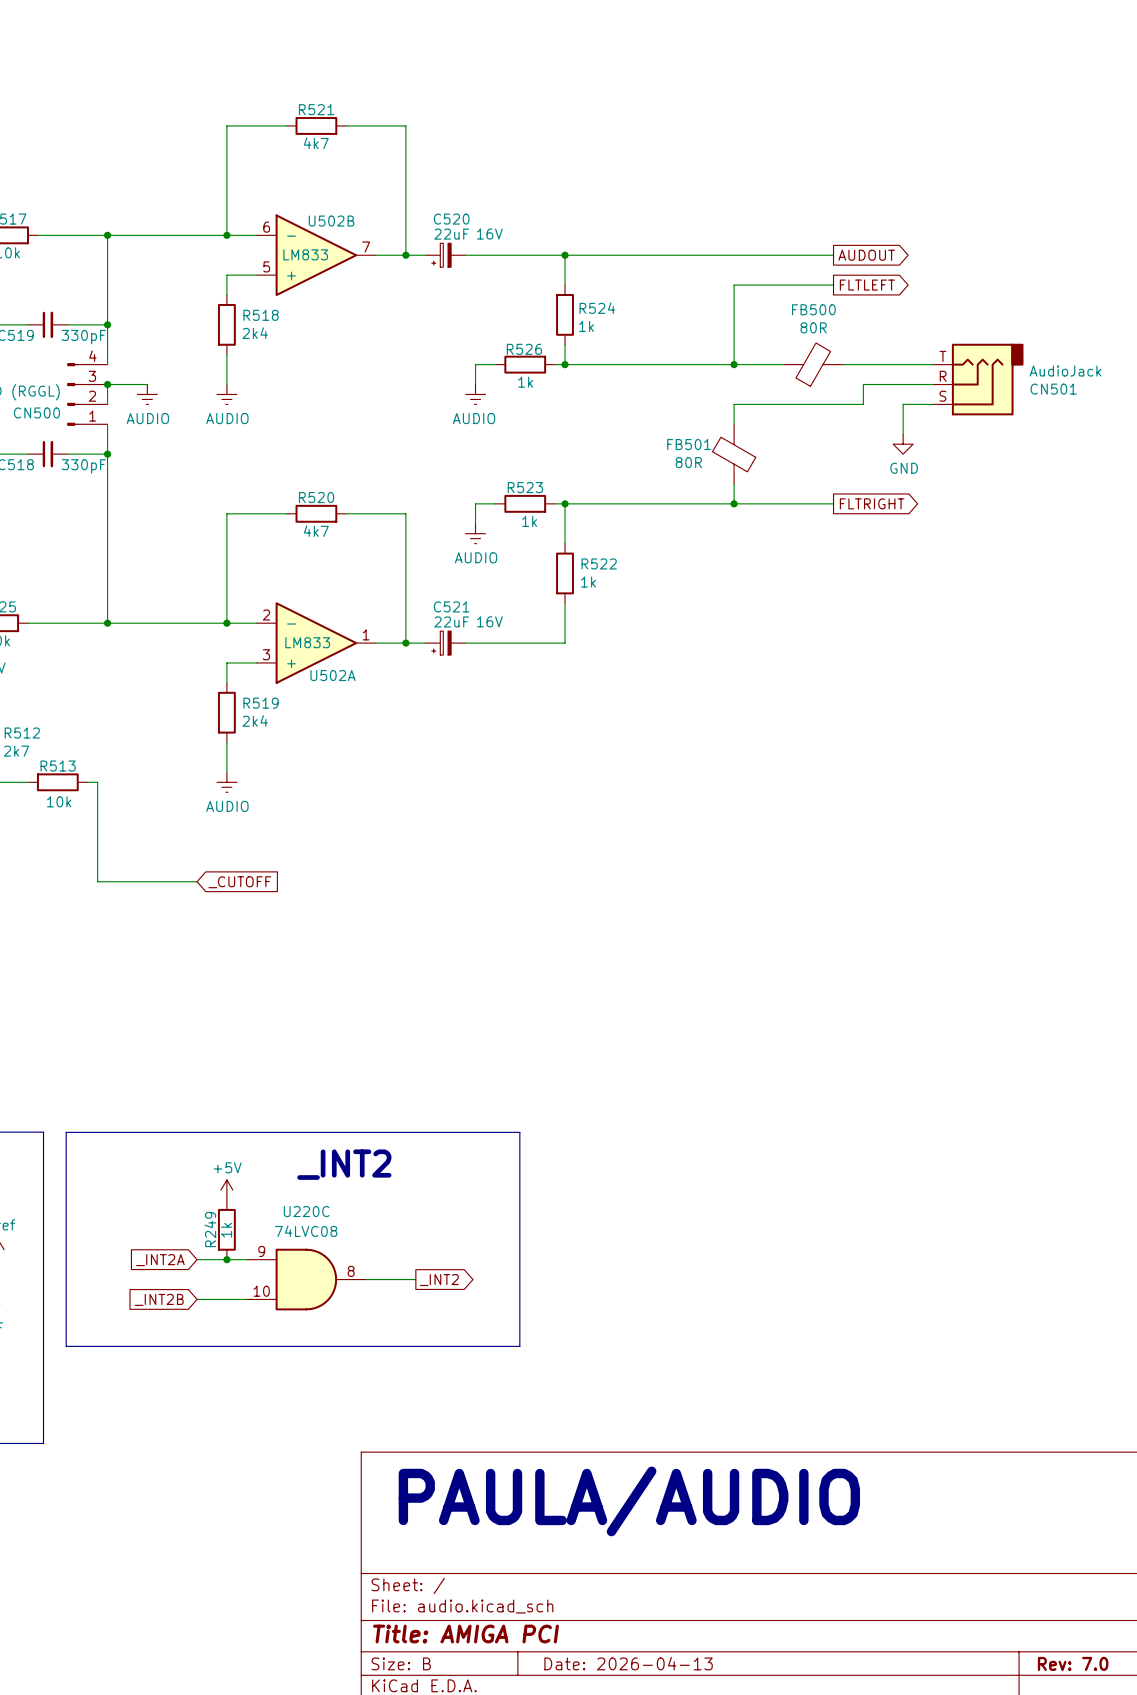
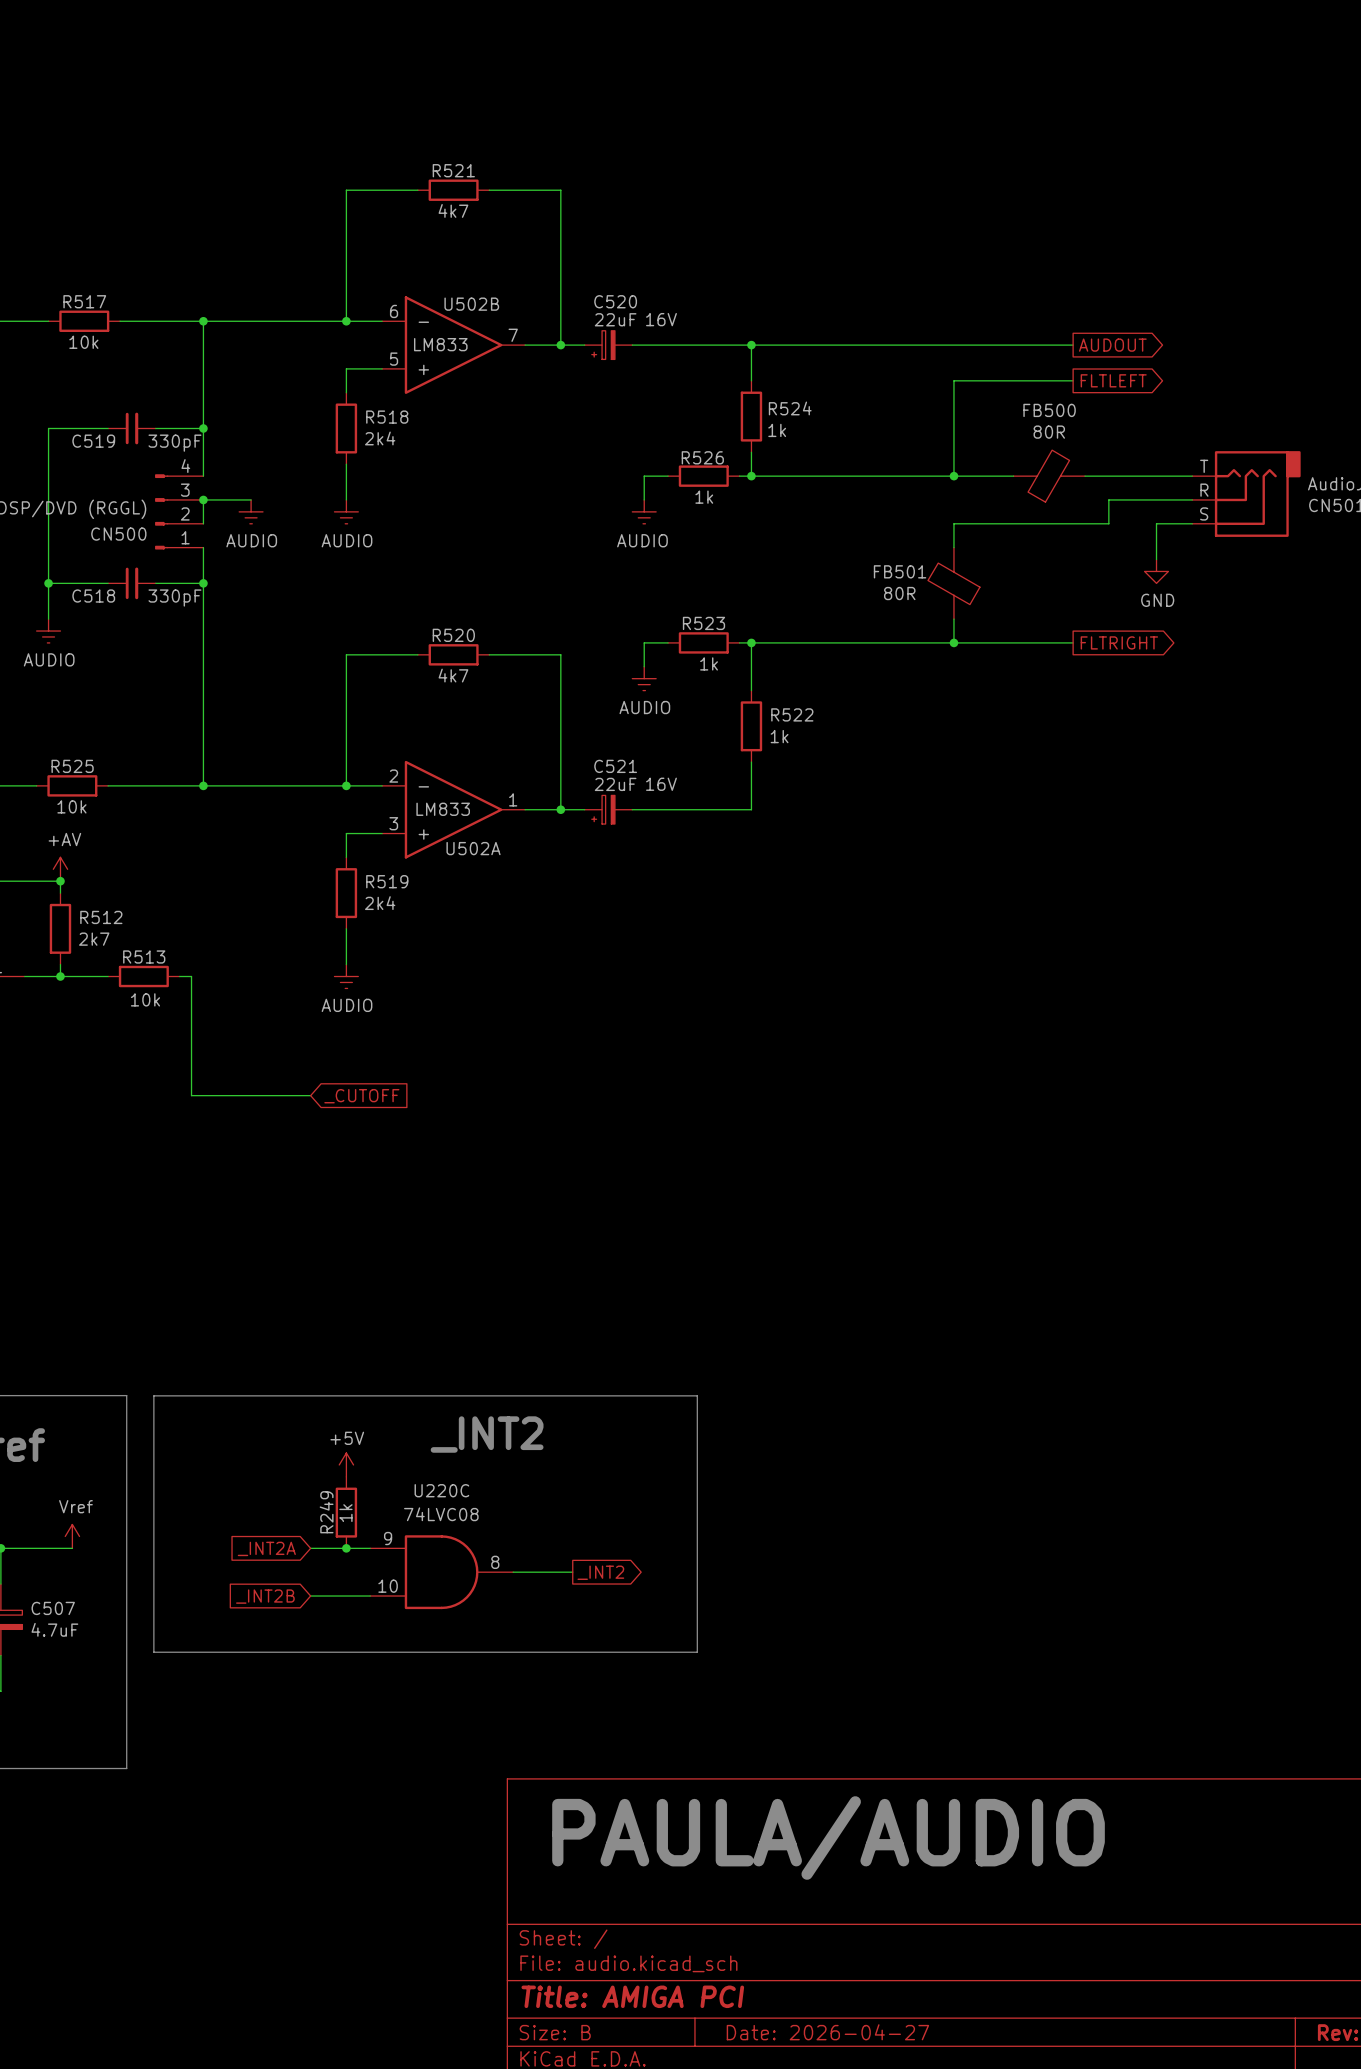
title block: Date: 2026-04-13 (628, 1663) -> Date: 2026-04-27 (827, 2032)

